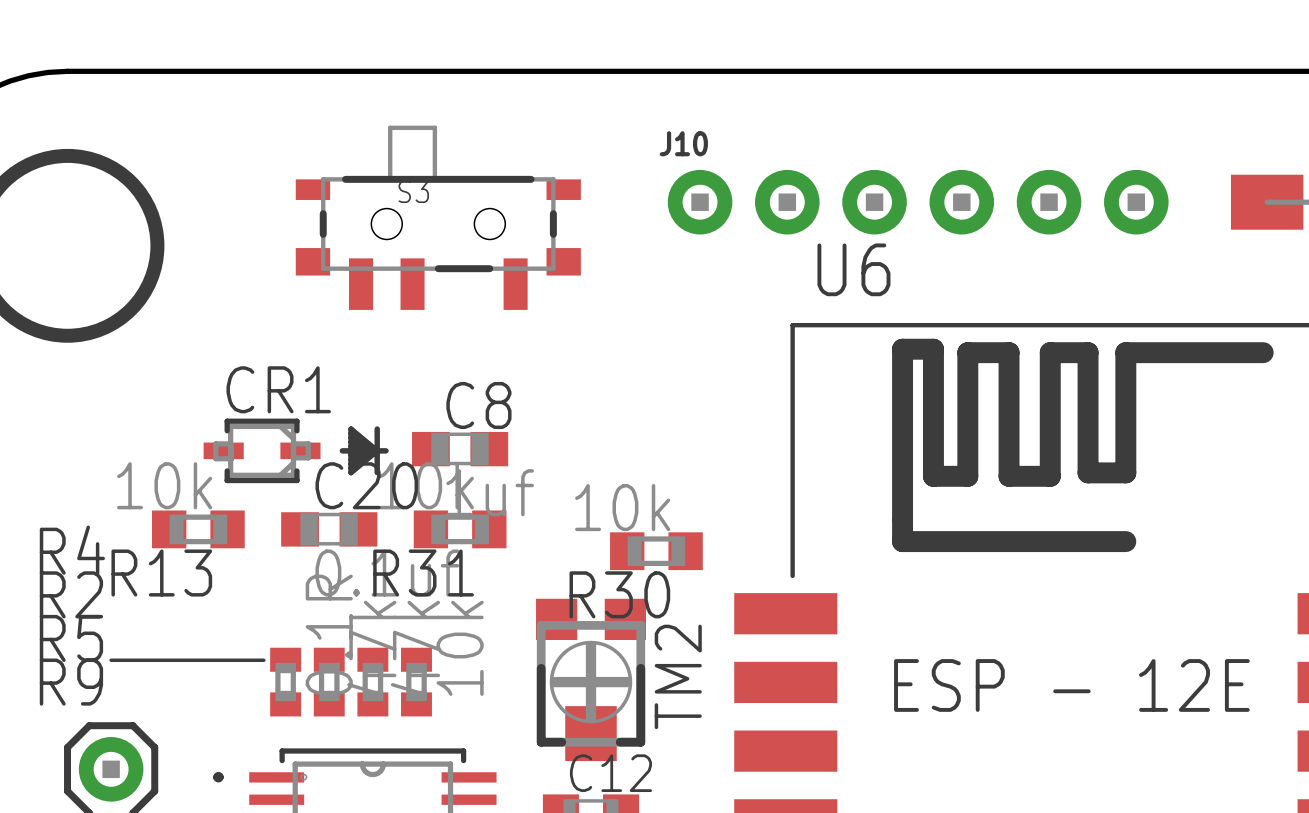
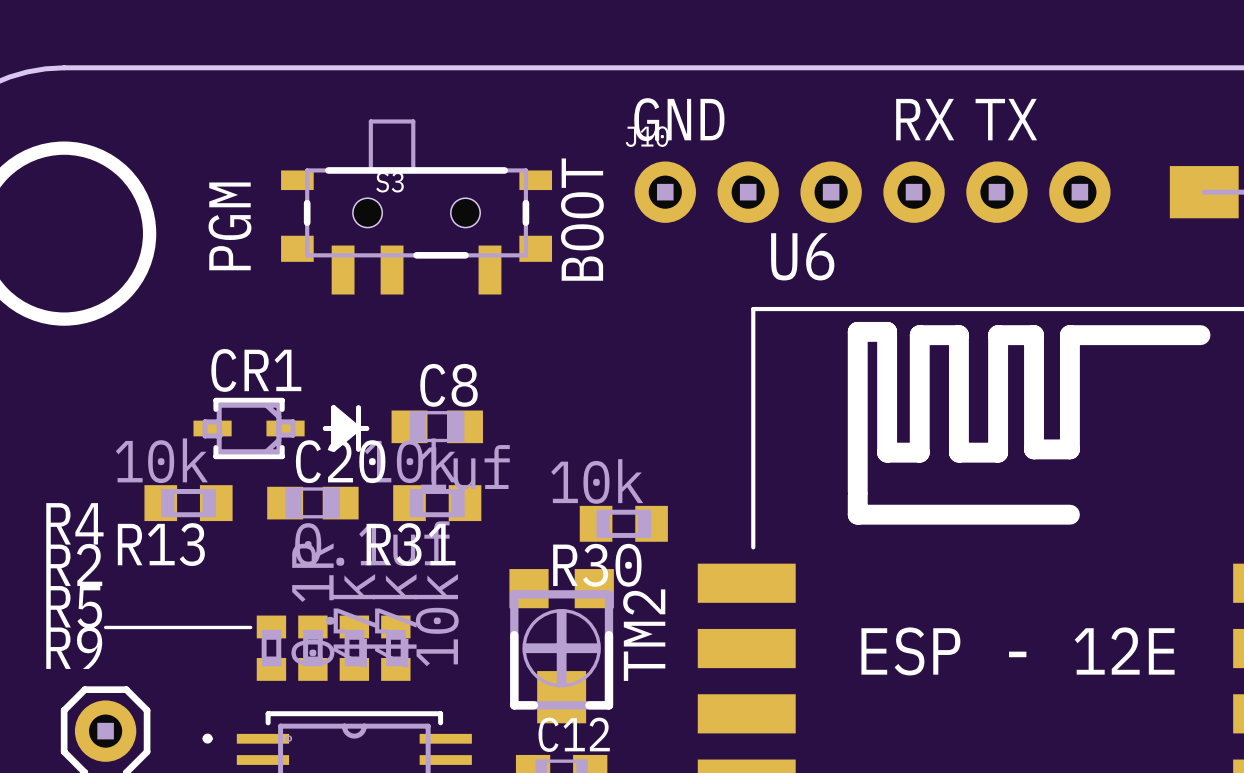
text: none -> GND (679, 119)
text: none -> RX (925, 119)
text: none -> TX (1006, 119)
text: none -> BOOT (582, 219)
text: none -> PGM (229, 226)

